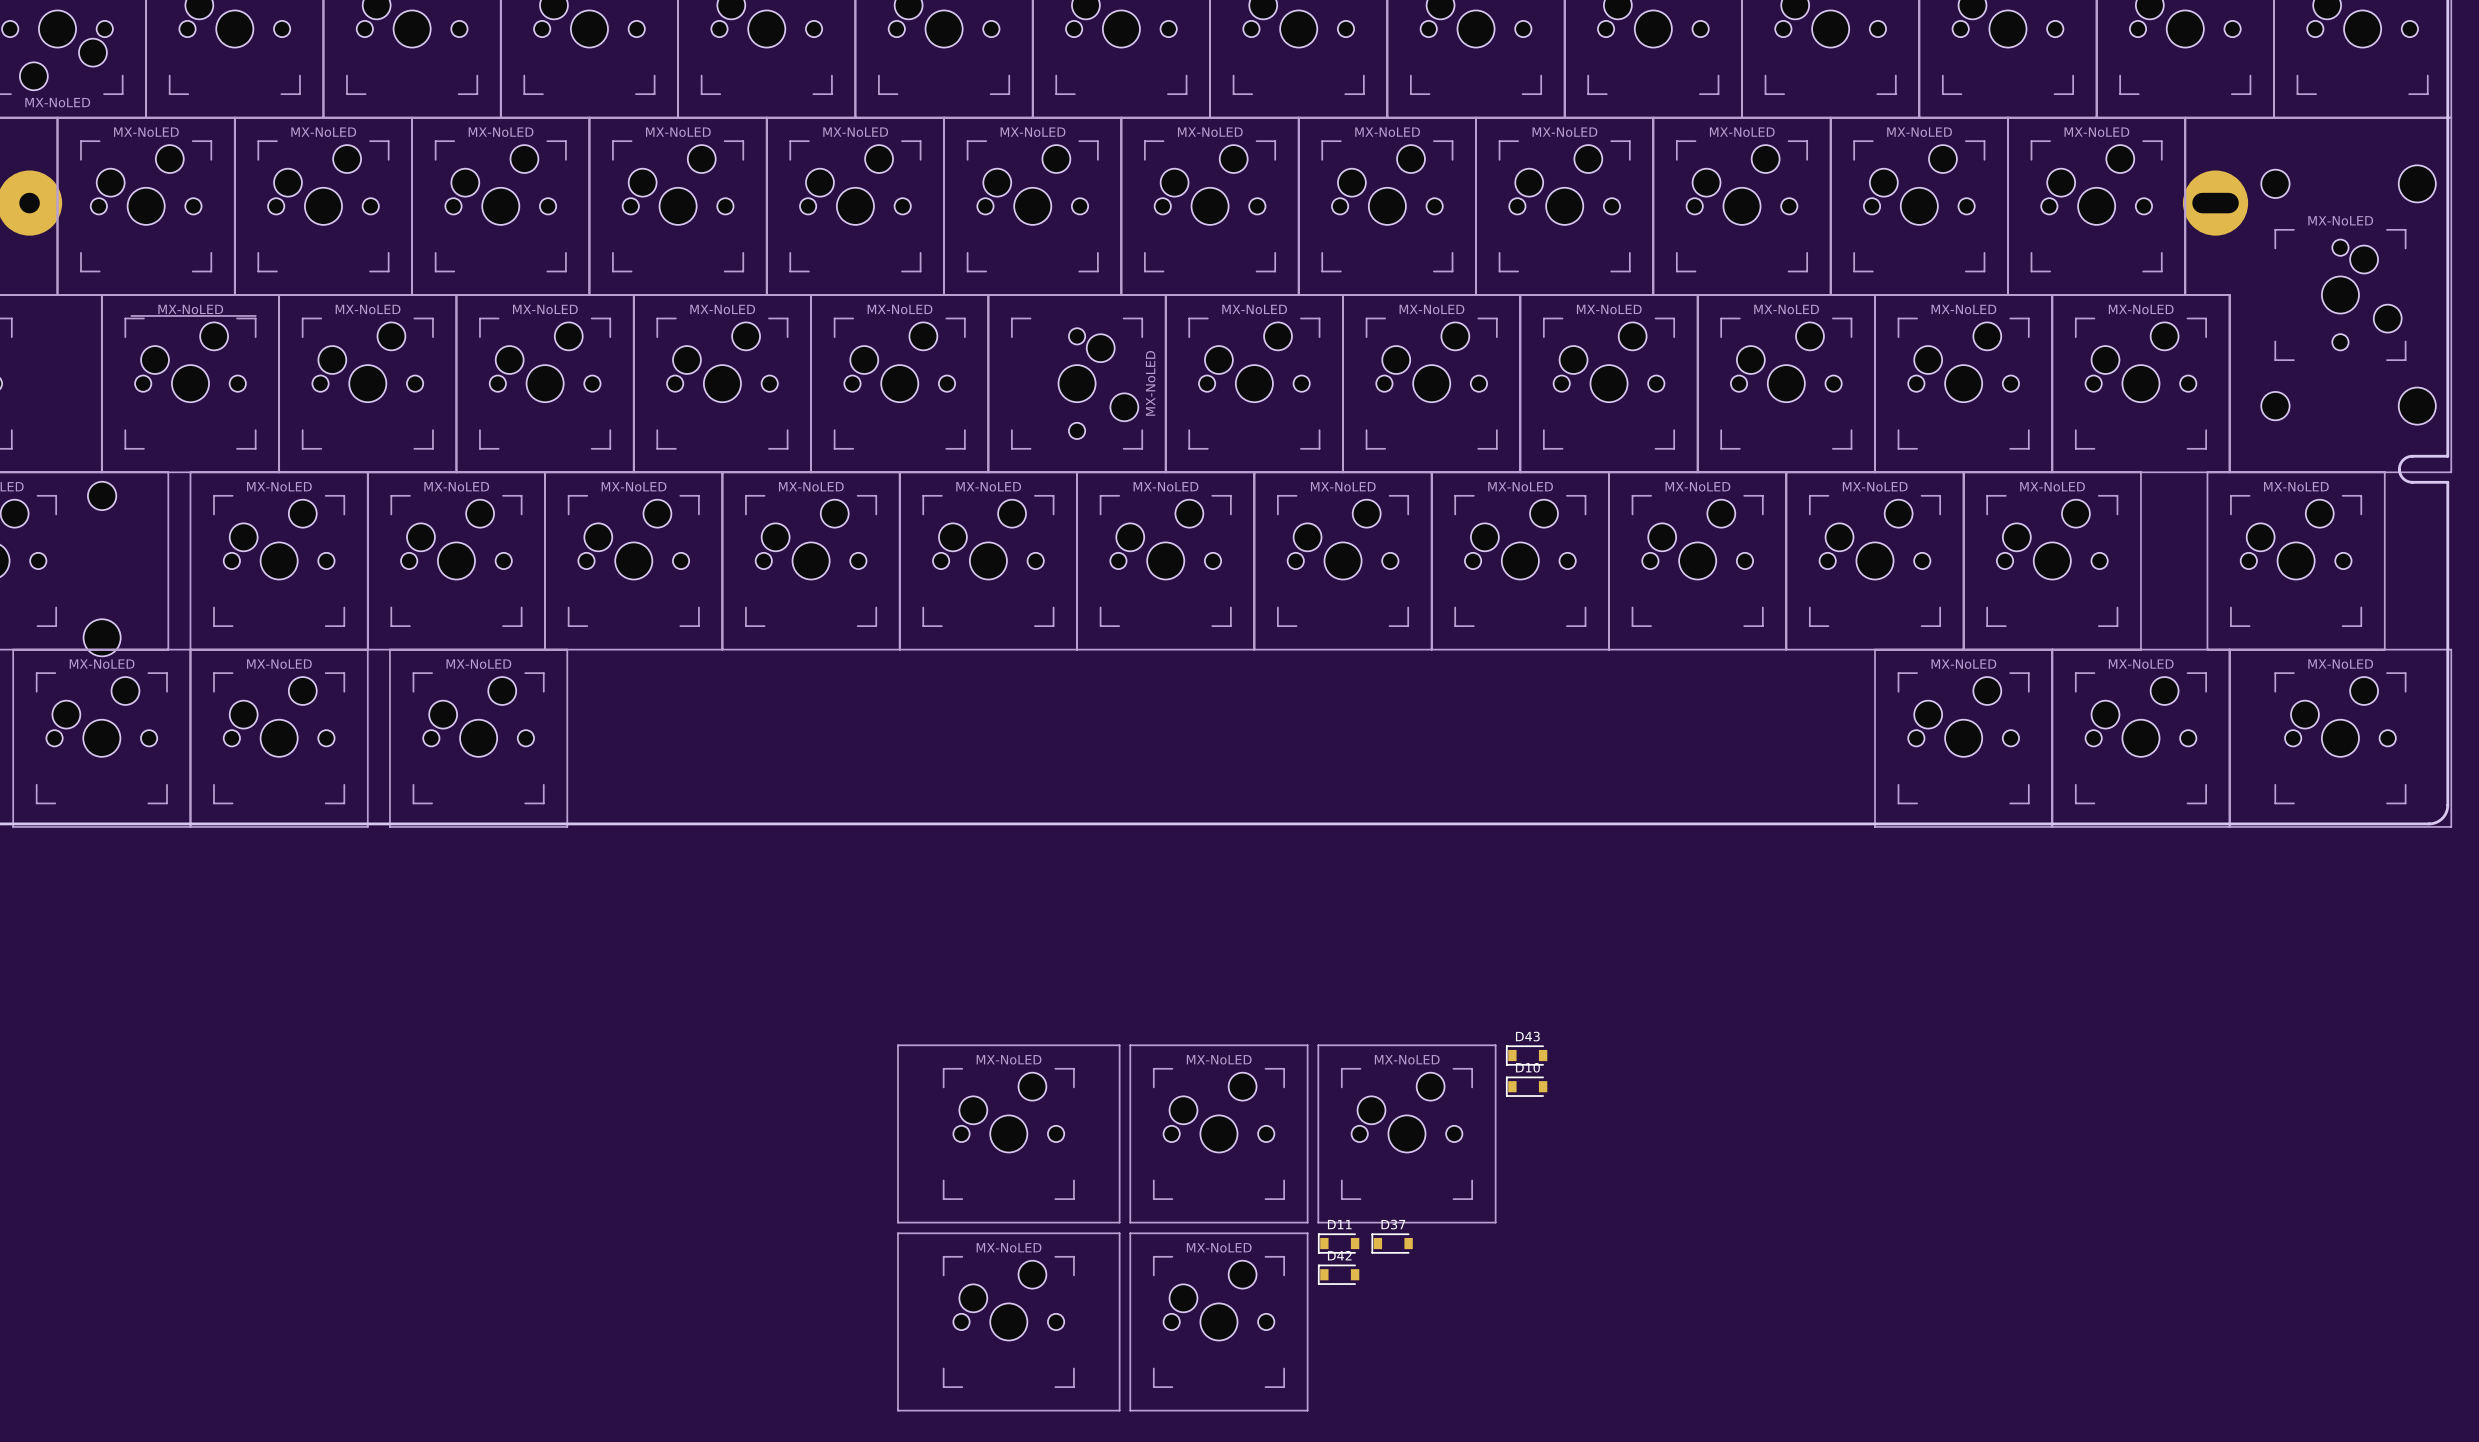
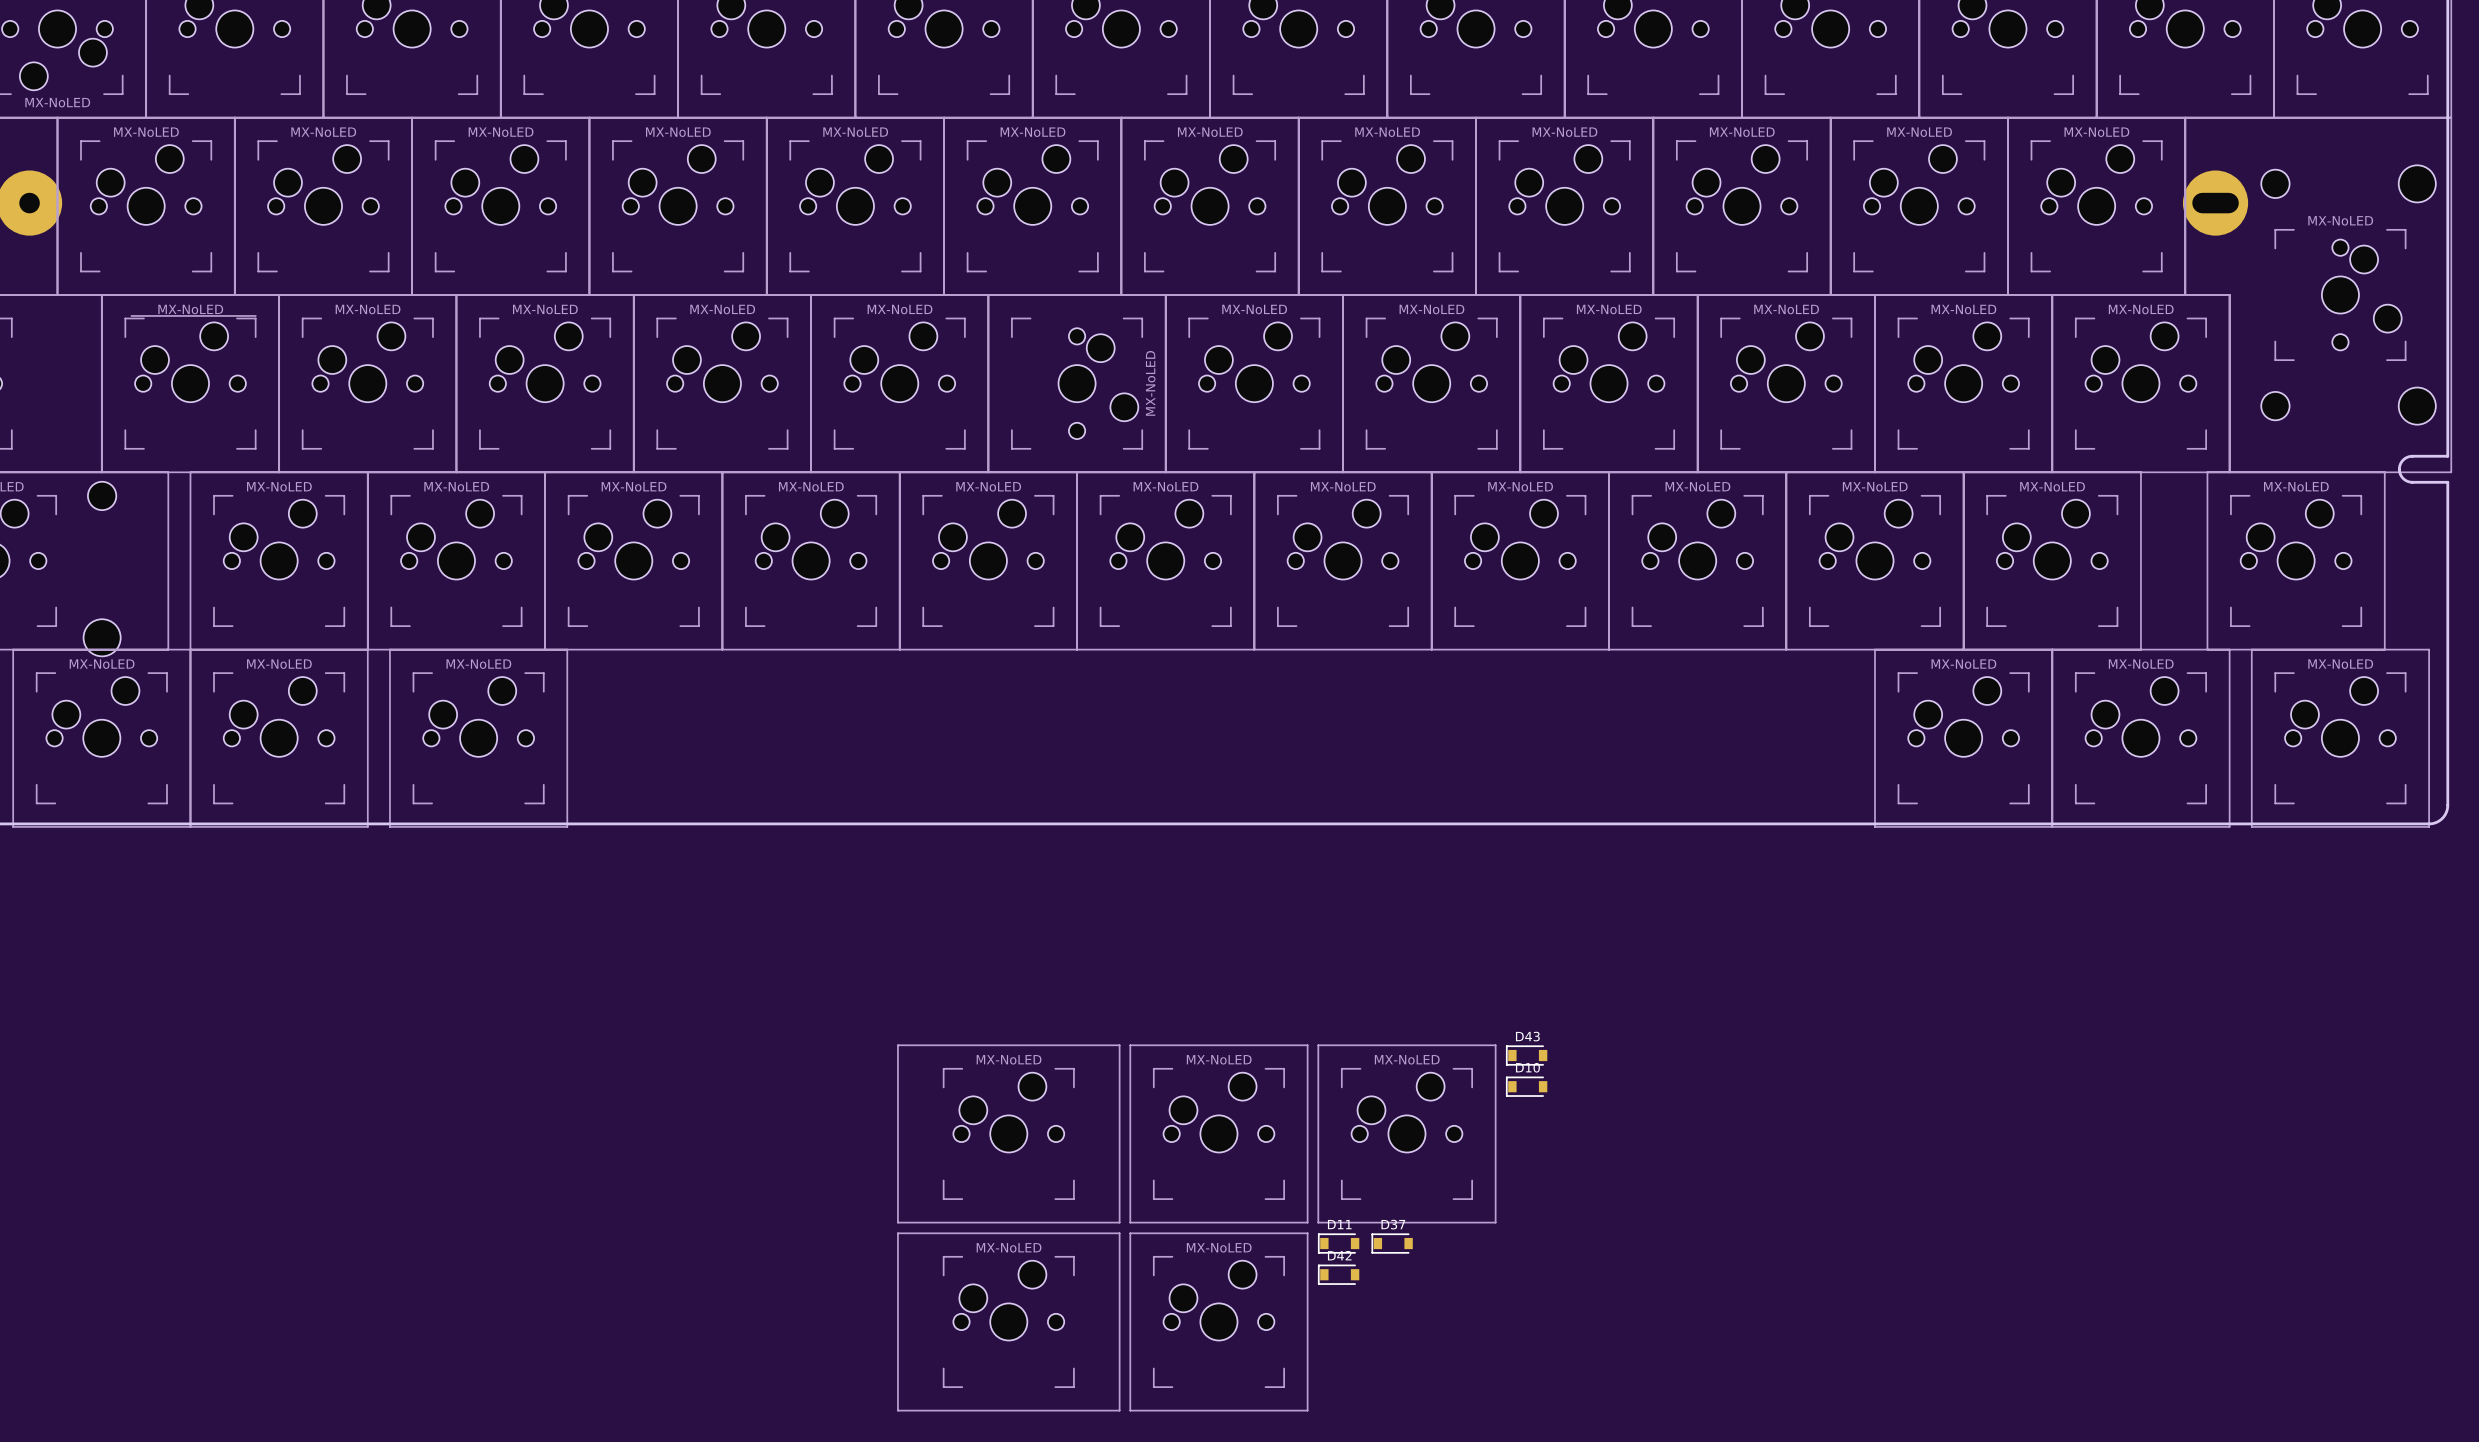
part footprint: [2228, 648, 2452, 828] -> [2251, 648, 2430, 828]

